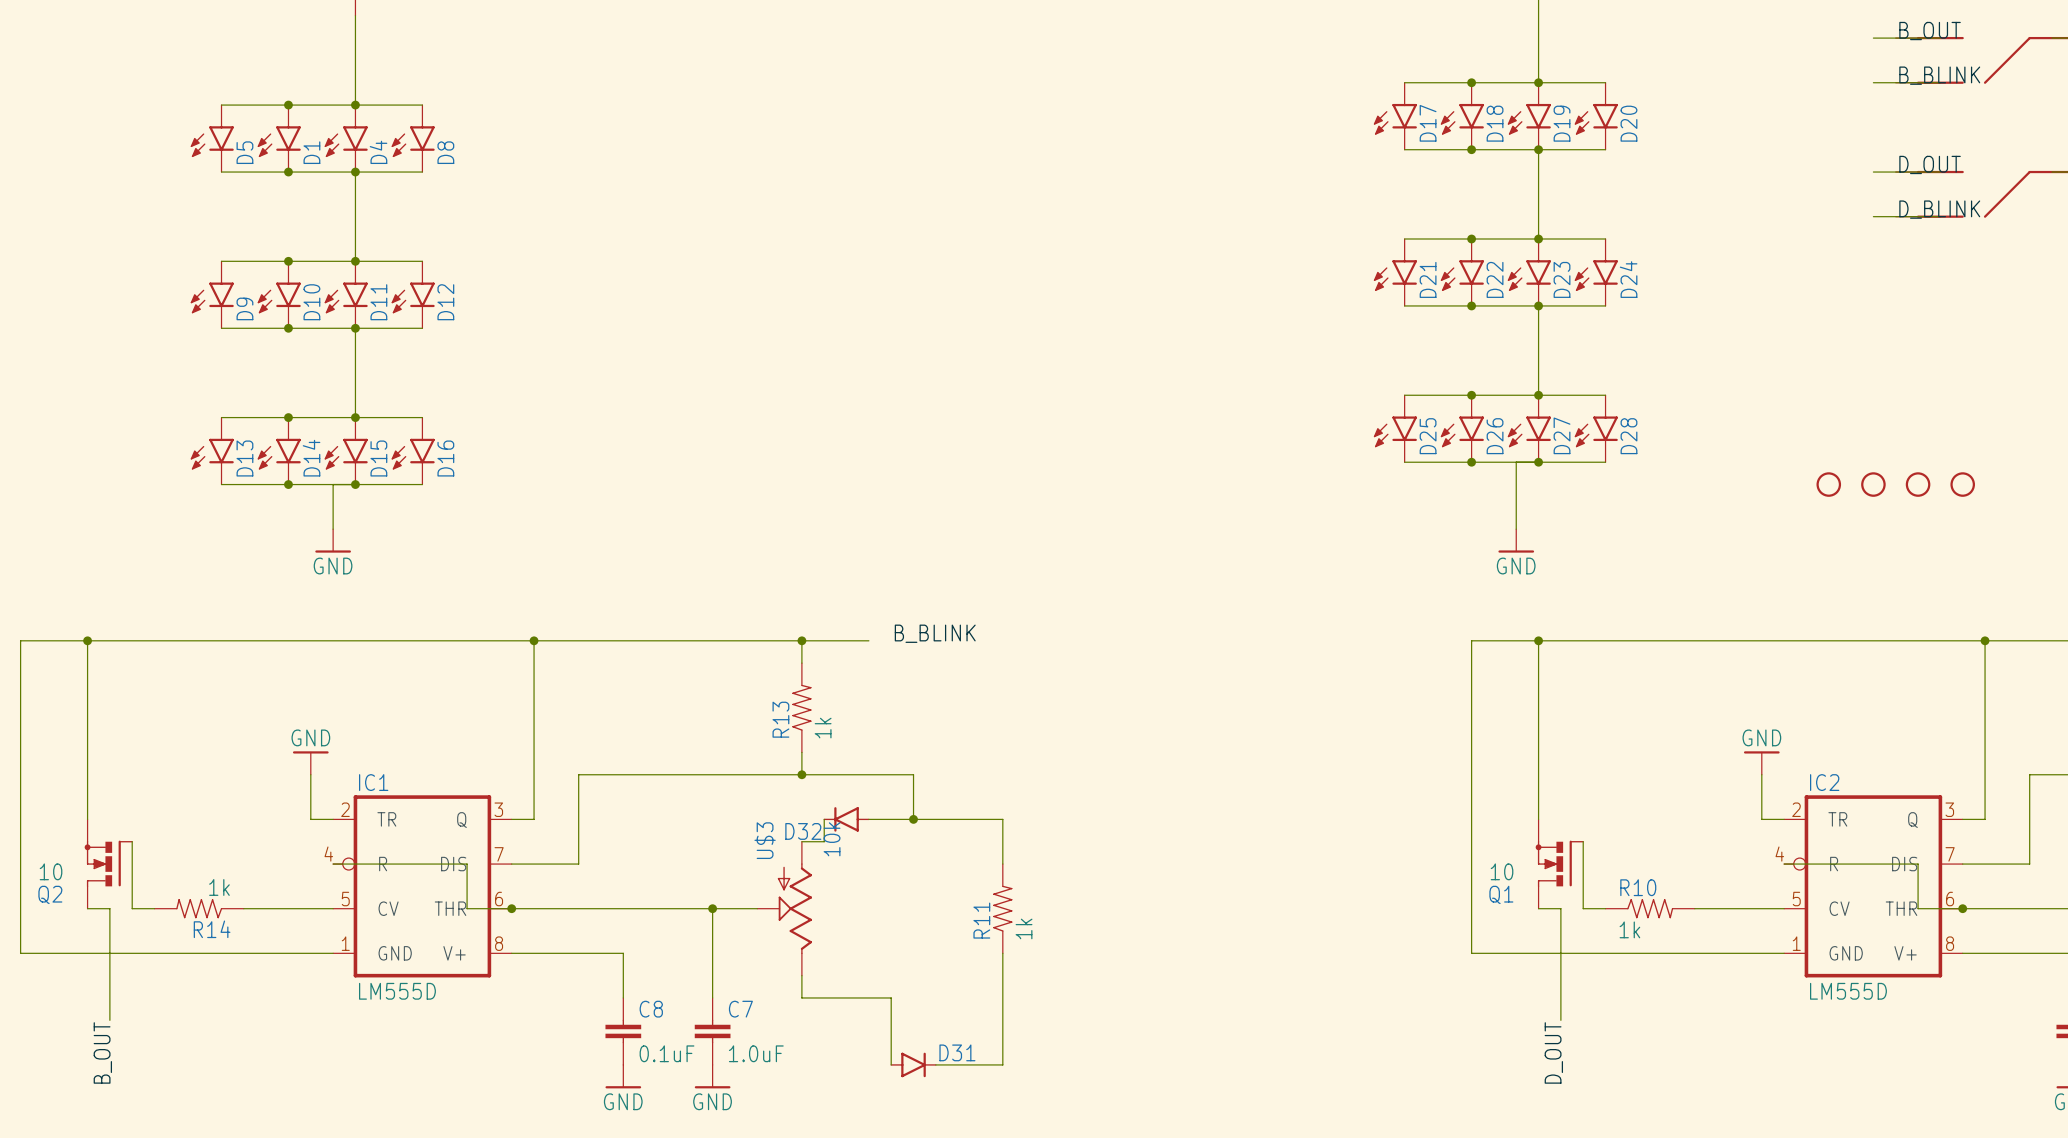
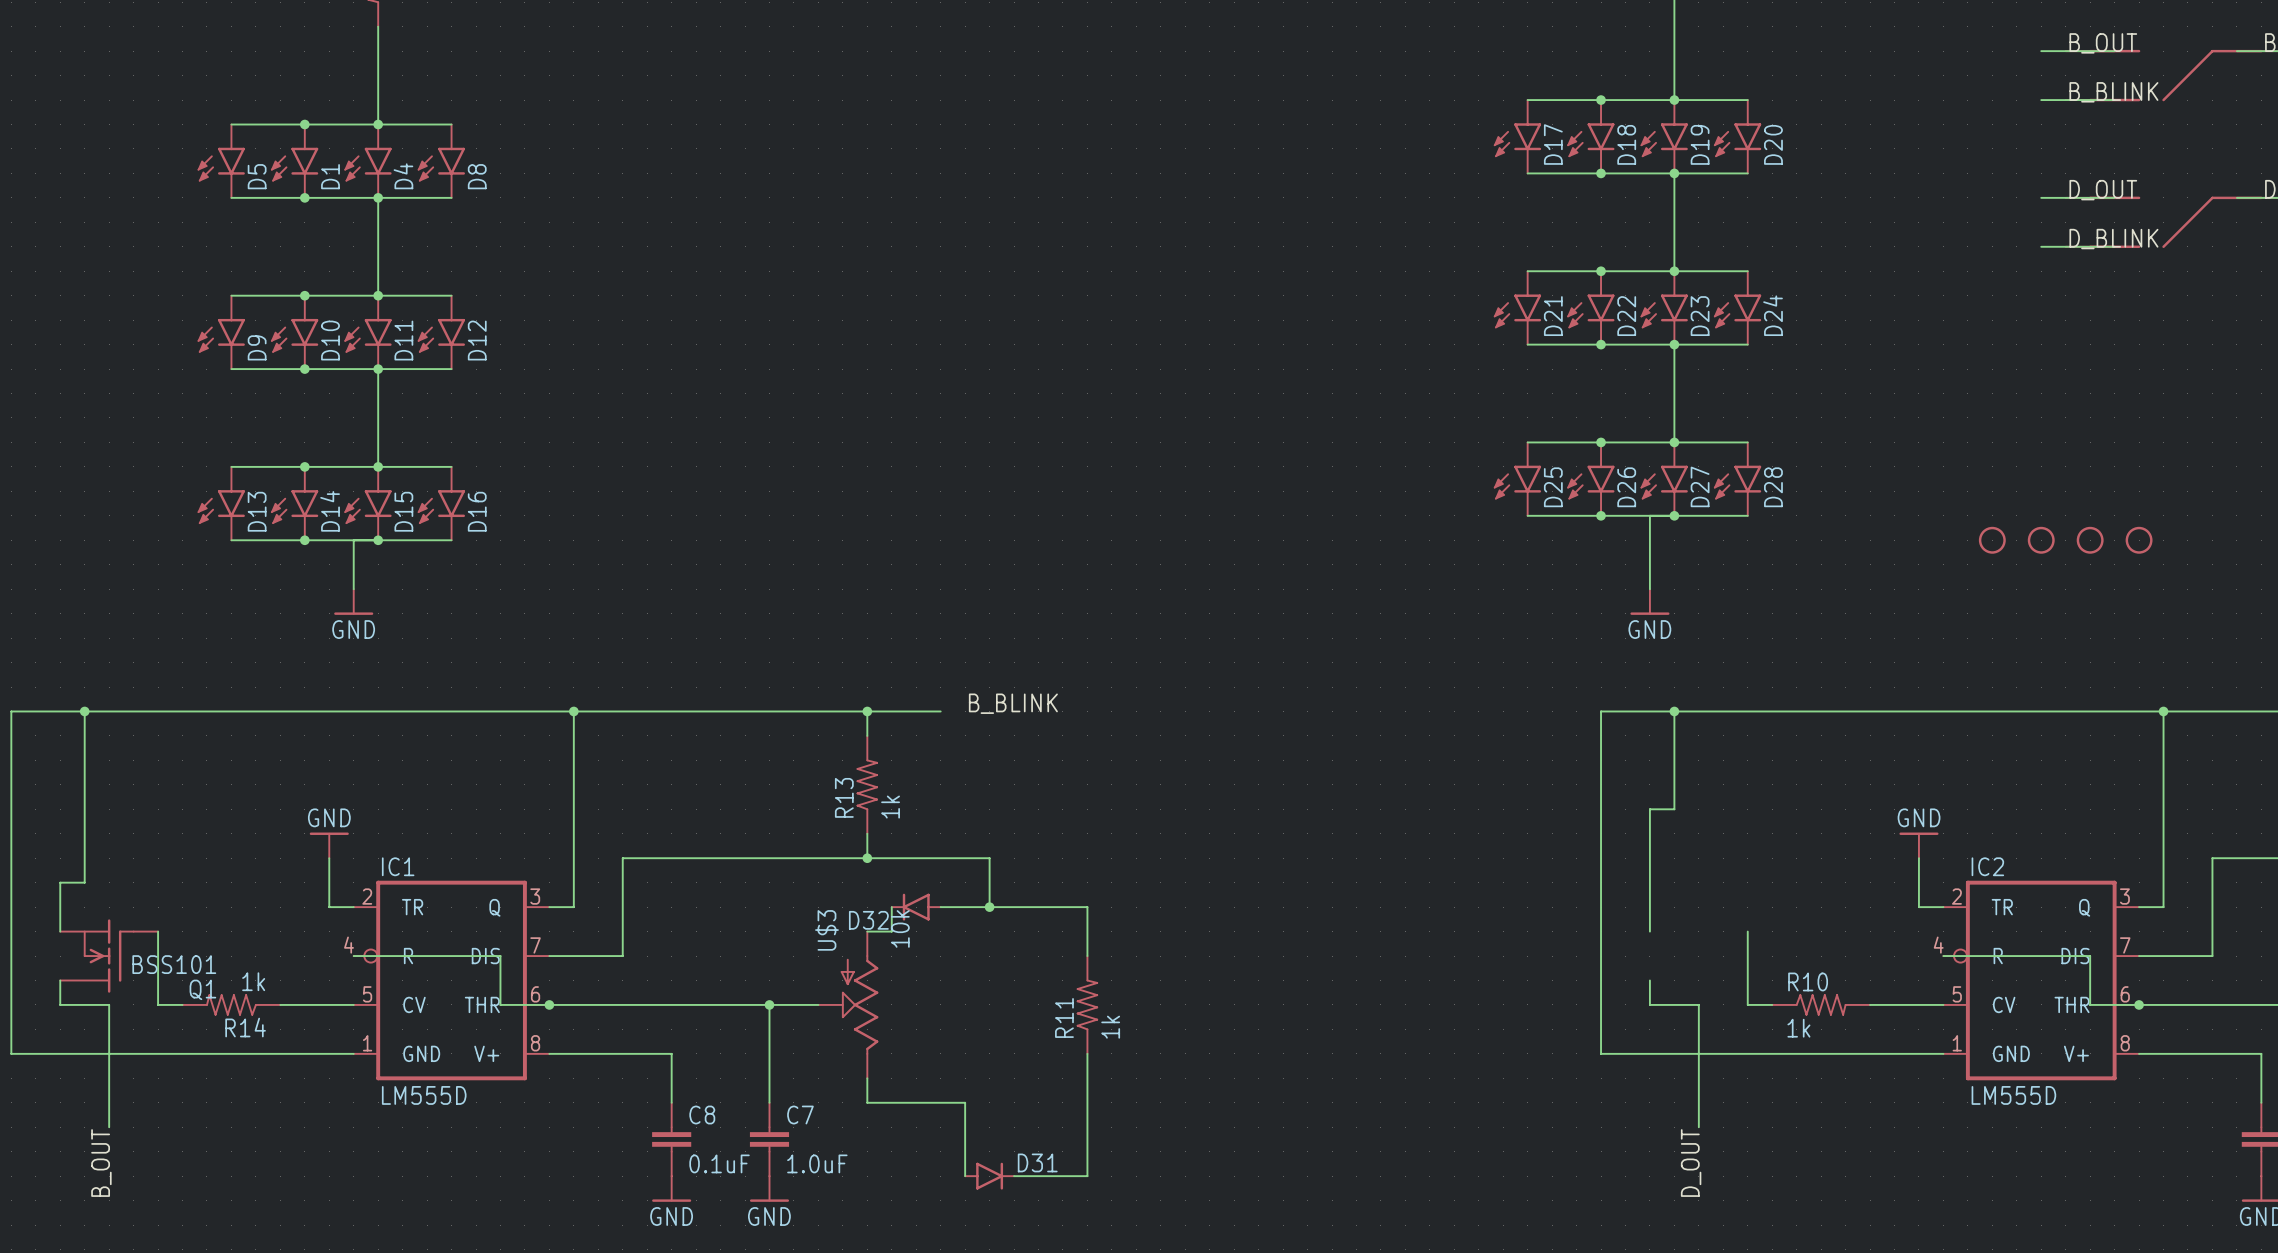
wire: (1538, 730) (1538, 819) -> (1674, 809) (1649, 809) (1649, 931)
wire: (87, 797) (87, 819) -> (84, 882) (60, 882) (60, 931)
Q1 symbol: [1535, 819, 1584, 909] -> [60, 919, 159, 993]
wire: (132, 841) (132, 908) (154, 908) -> (158, 931) (158, 1004) (182, 1004)
wire: (1583, 841) (1583, 908) (1605, 908) -> (1747, 931) (1747, 1004) (1772, 1004)
Q2: 10 (108, 864) -> none
Q1 value: 10 (1502, 871) -> BSS101 (174, 964)
wire: none -> (60, 980) (60, 1004) (84, 1004)
wire: none -> (1649, 980) (1649, 1004) (1674, 1004)
Q1 name position: Q1 (1501, 894) -> Q1 (202, 989)
R14 position: (199, 908) -> (231, 1004)
R10 position: (1650, 908) -> (1821, 1004)

